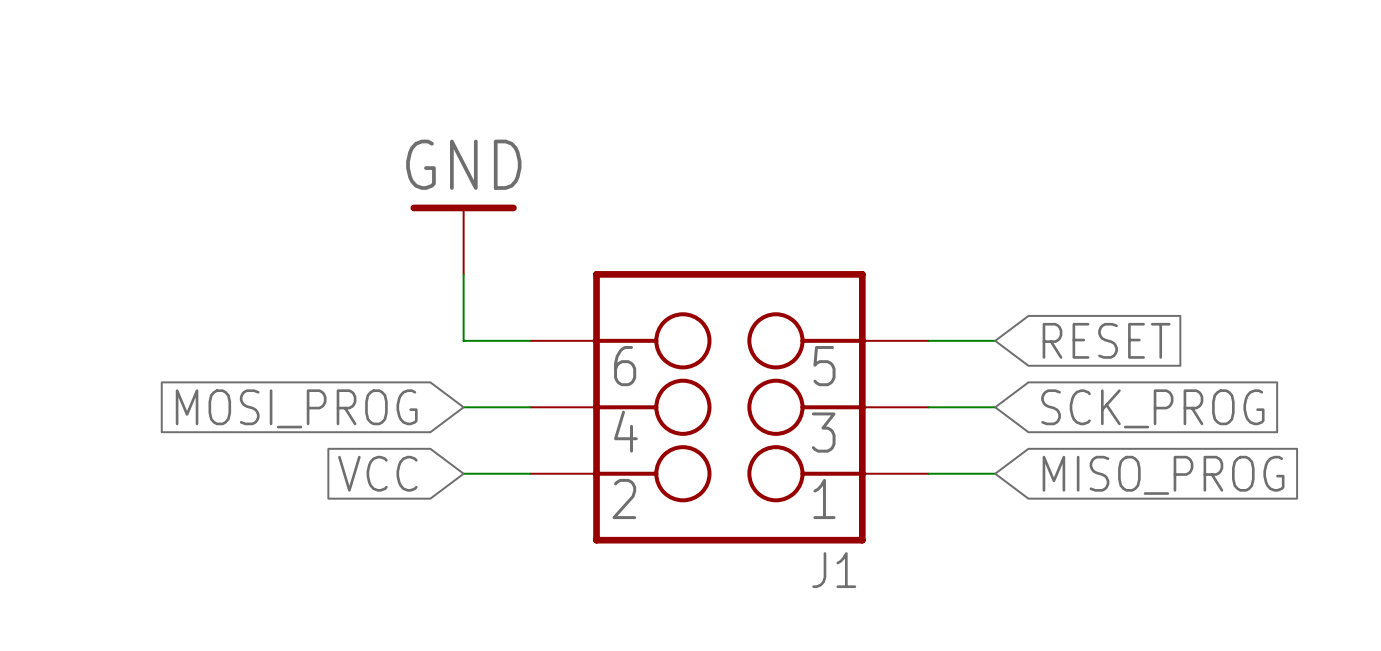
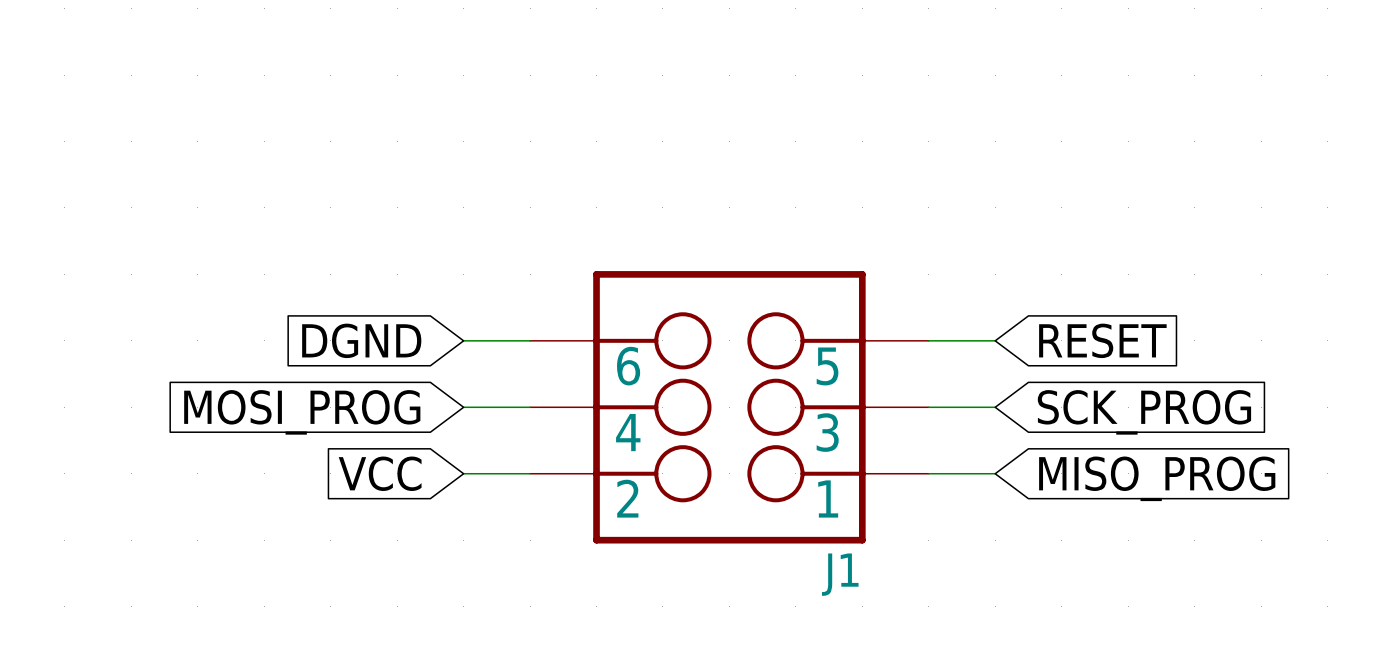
power symbol: GND (463, 239) -> none
wire: (463, 274) (463, 340) -> none
global label: none -> DGND (361, 340)

